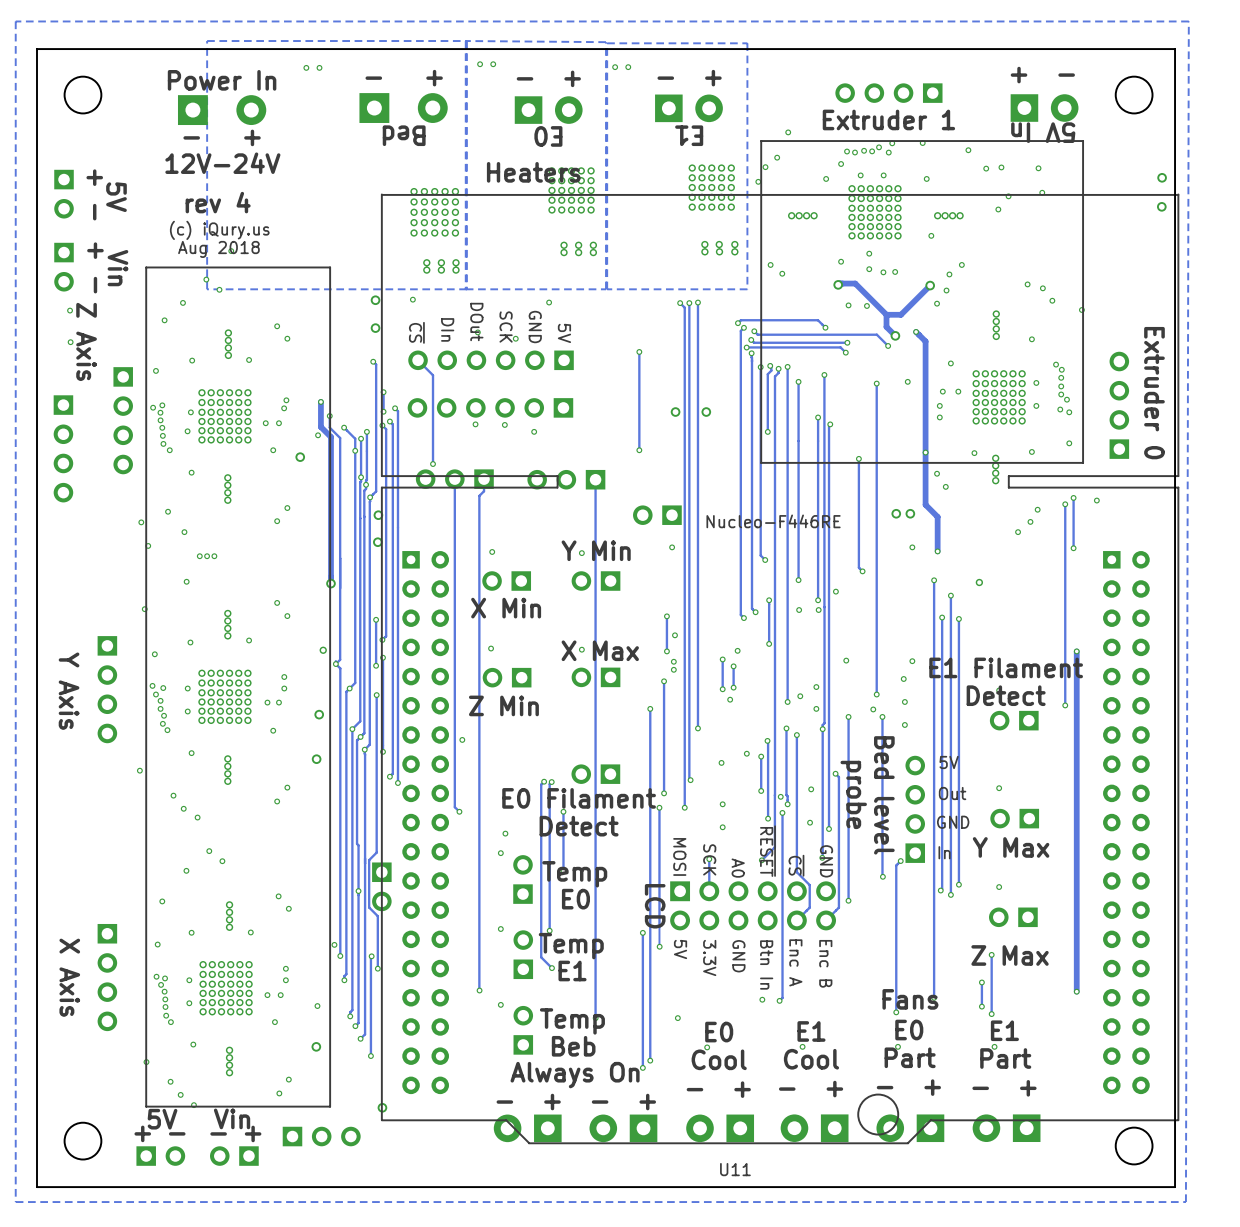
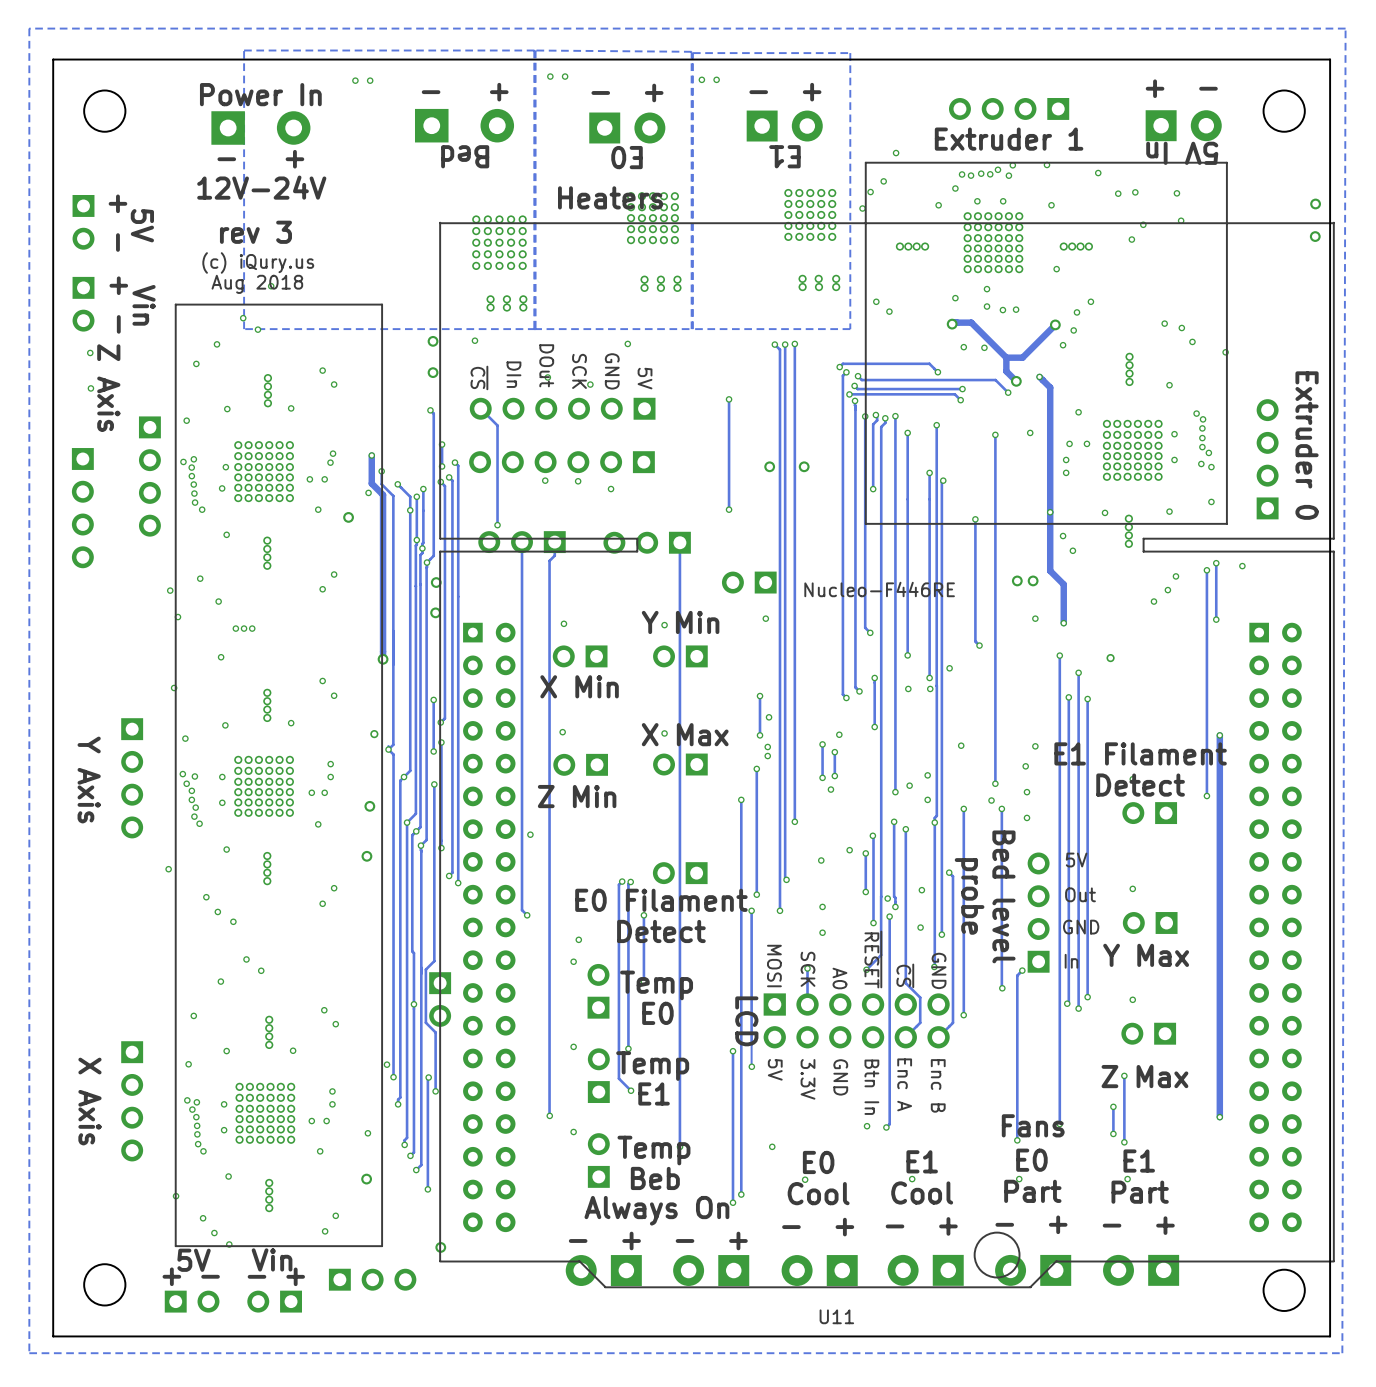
text: rev 4 (218, 202) -> rev 3 (255, 232)

